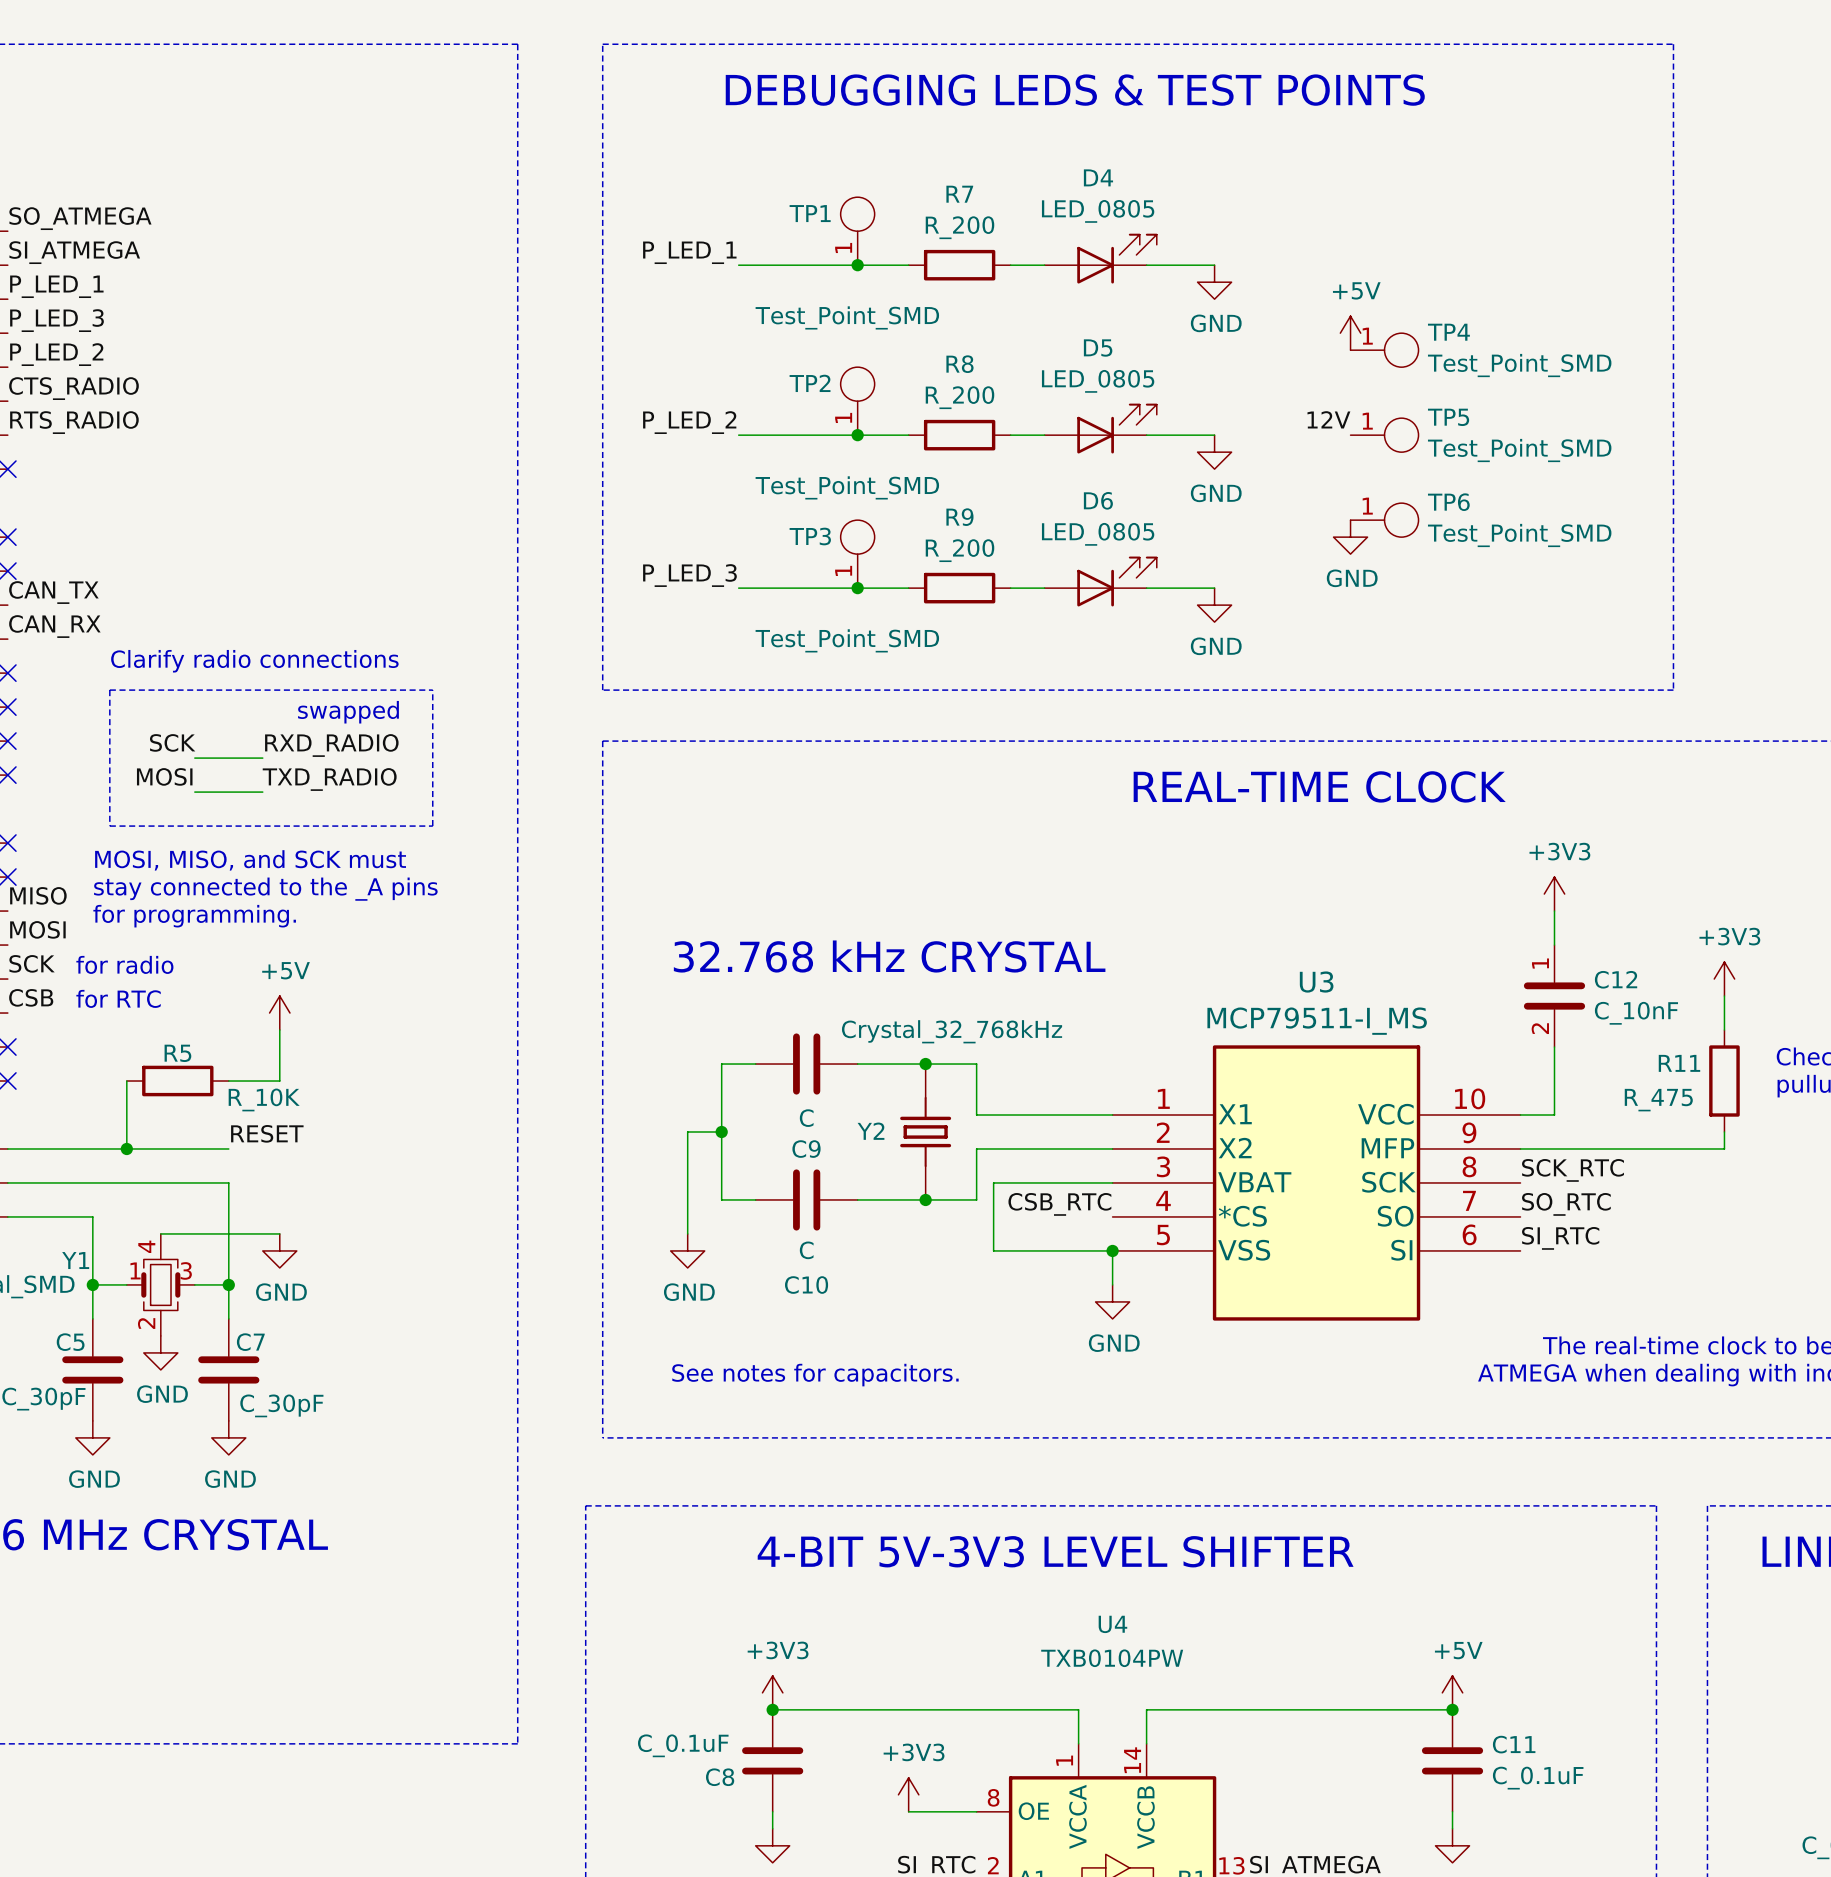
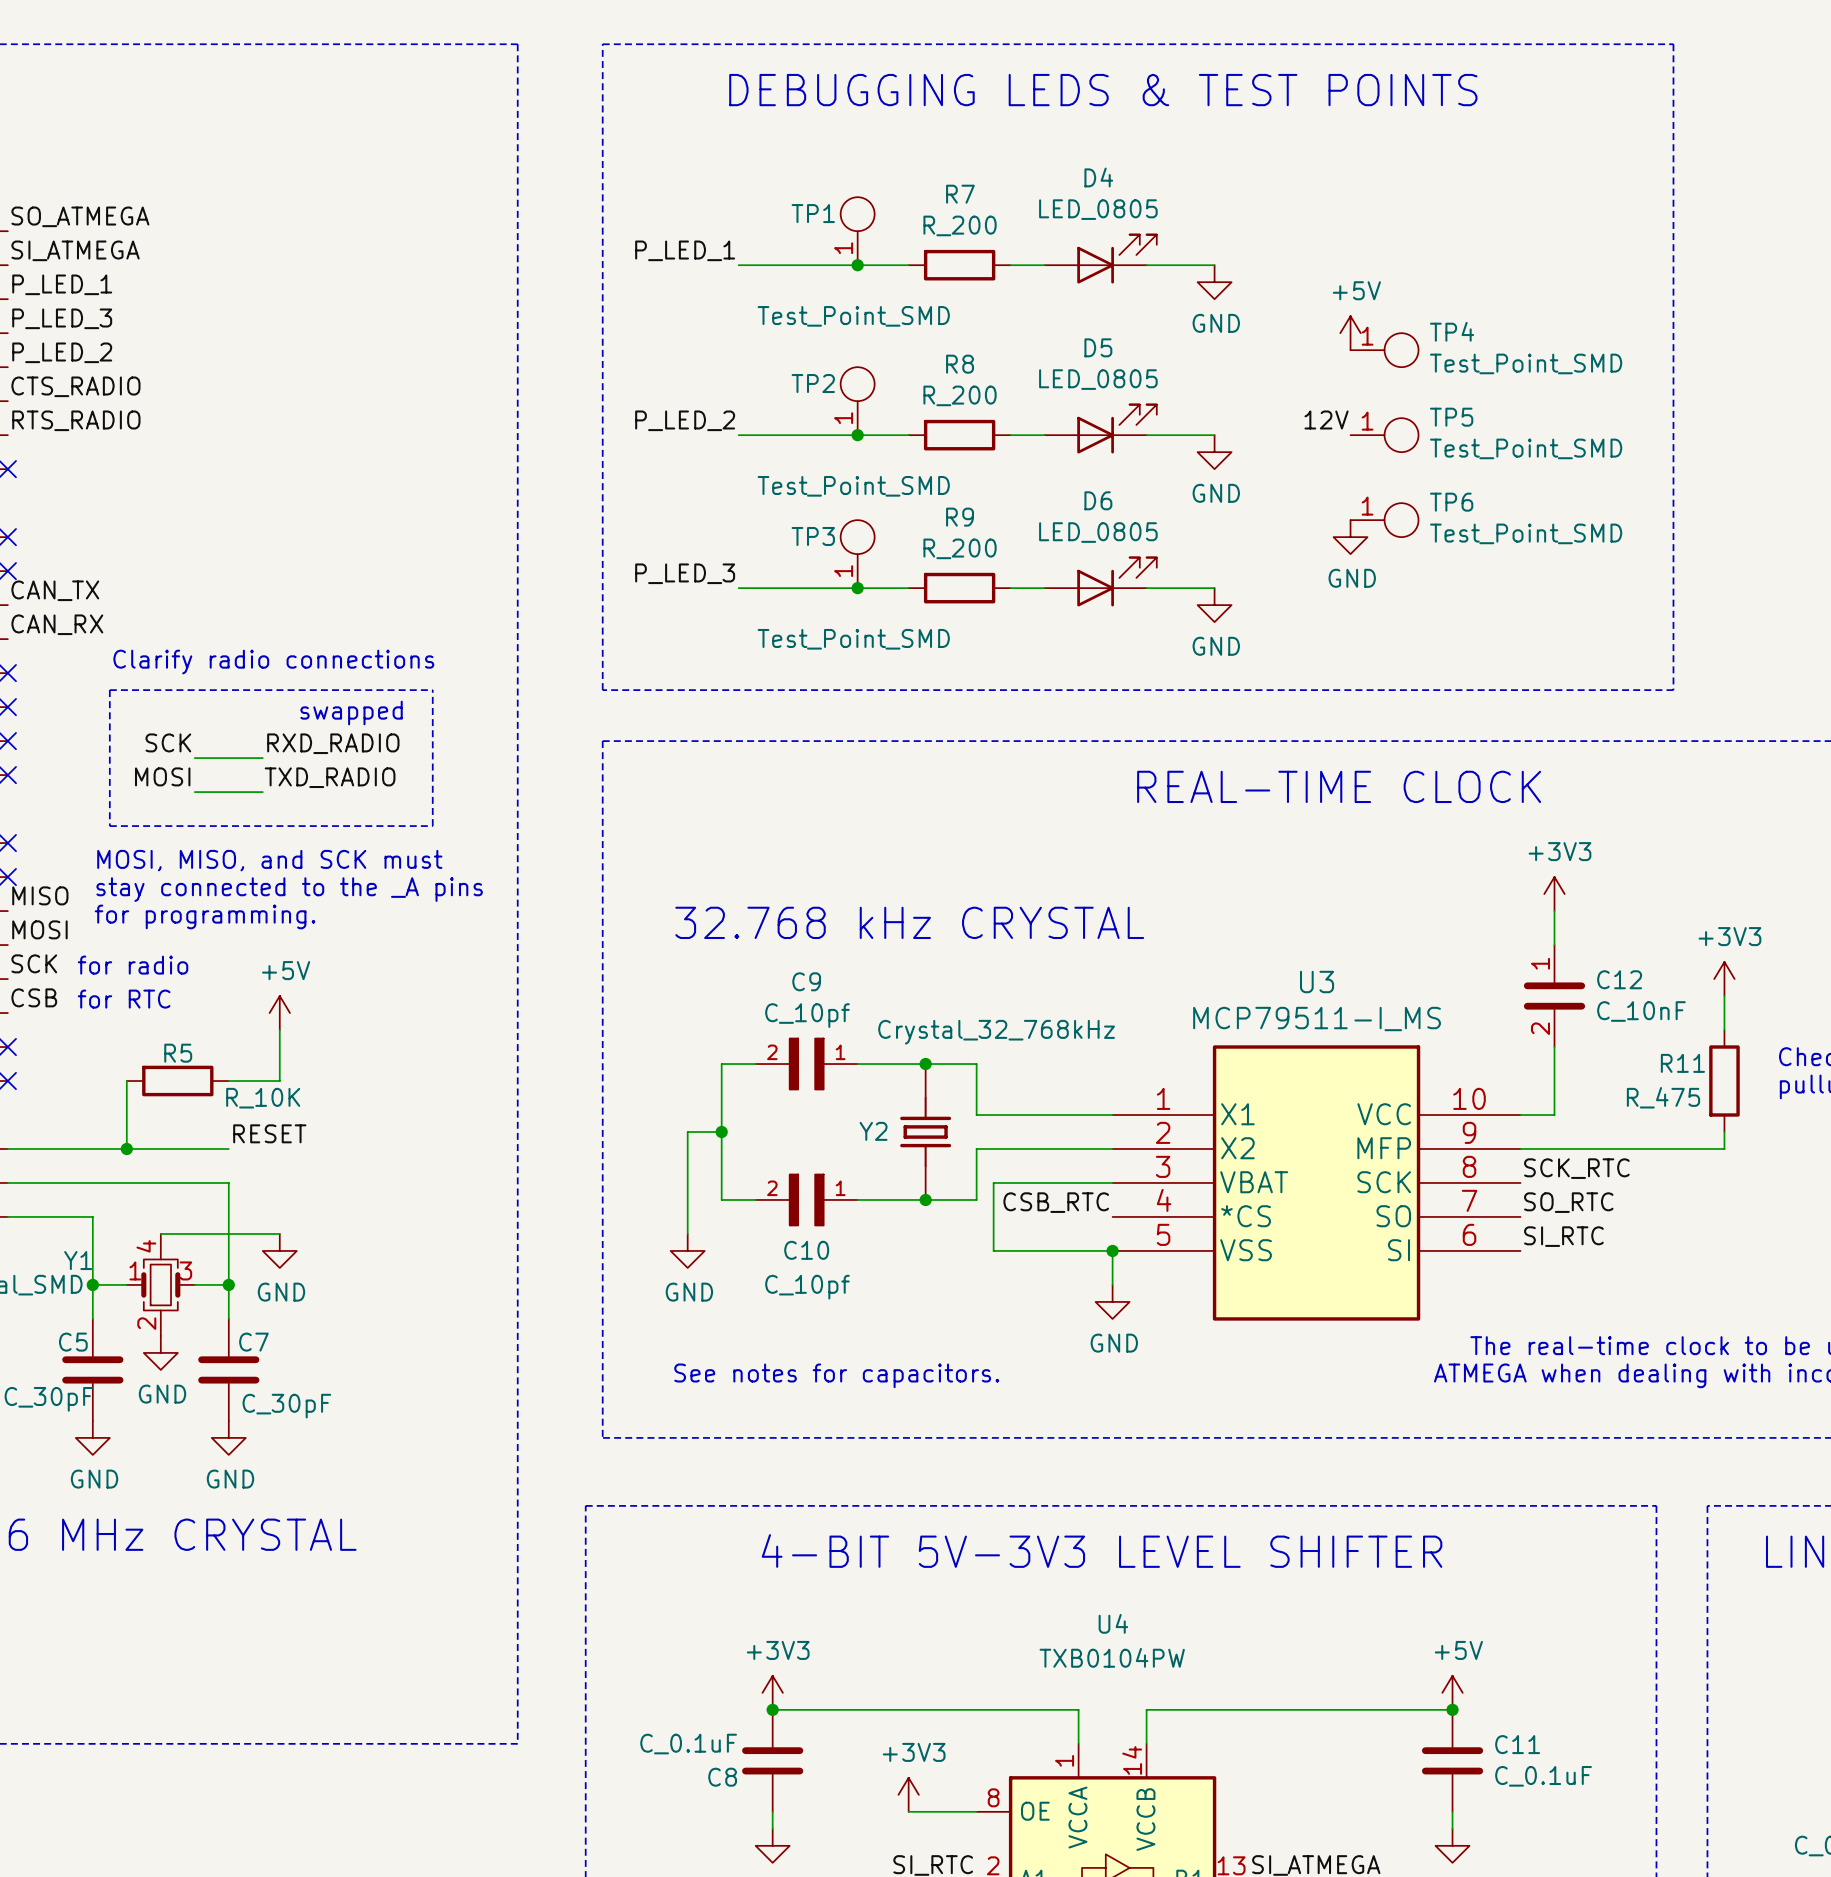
text position: 32.768 kHz CRYSTAL (889, 956) -> 32.768 kHz CRYSTAL (909, 922)
Y2 value position: Crystal_32_768kHz (952, 1031) -> Crystal_32_768kHz (996, 1032)
C9 symbol: [755, 1033, 858, 1095] -> [755, 1038, 858, 1090]
C9 value: C (806, 1118) -> C_10pf (807, 1015)
C9 name position: C9 (806, 1149) -> C9 (806, 981)
C10 symbol: [755, 1169, 858, 1231] -> [755, 1174, 858, 1226]
C10 value: C (806, 1250) -> C_10pf (807, 1287)
C10 name position: C10 (806, 1285) -> C10 (806, 1250)

